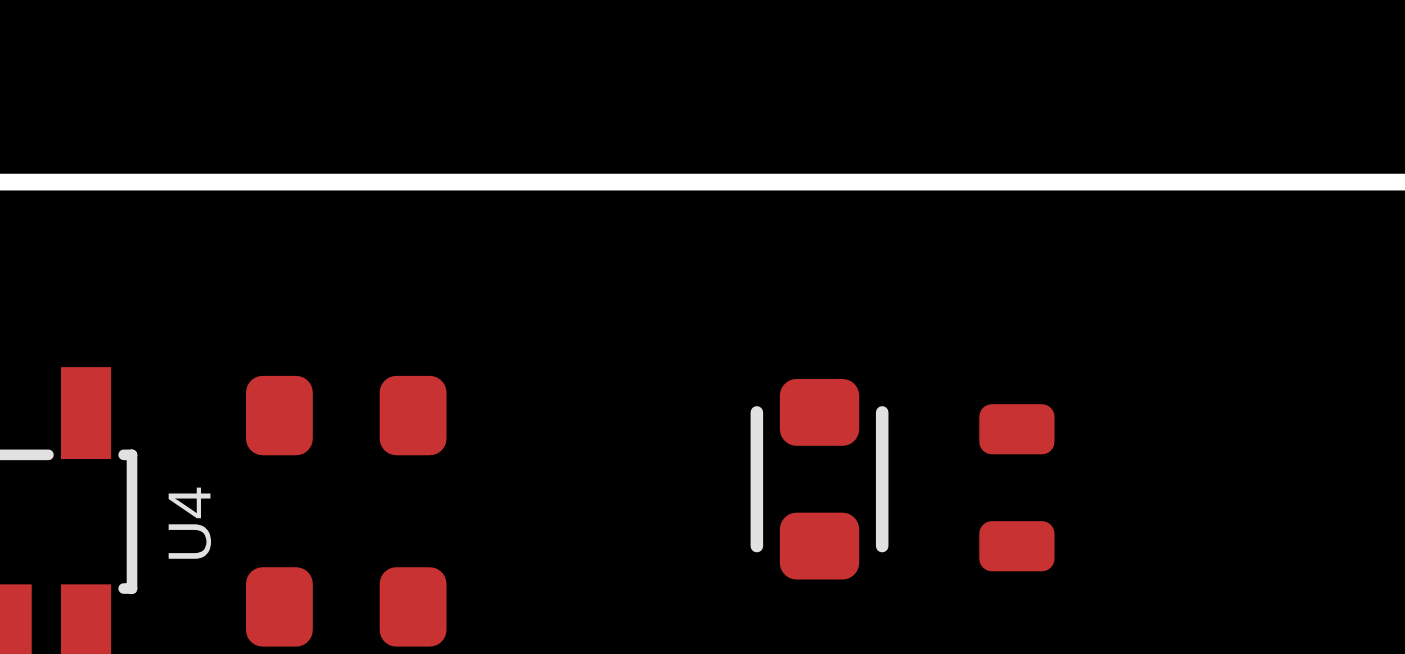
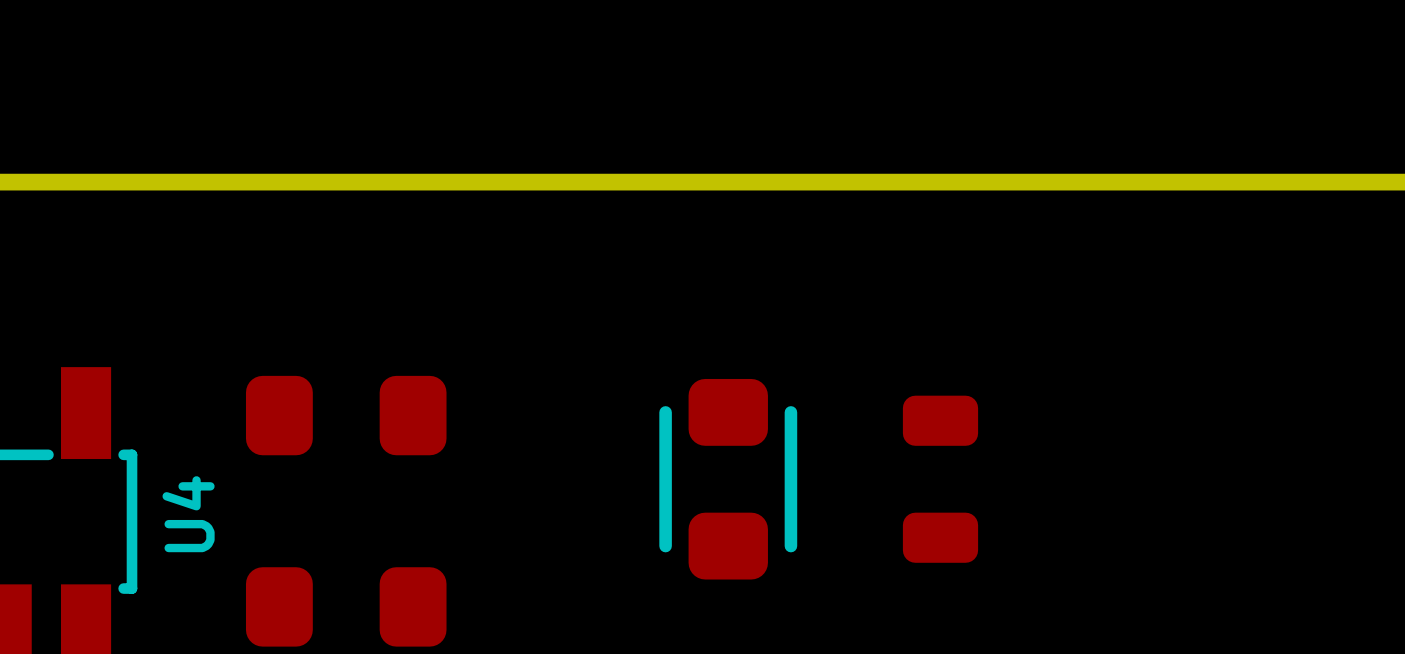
part position: (819, 479) -> (728, 479)
part position: (1016, 487) -> (940, 479)

